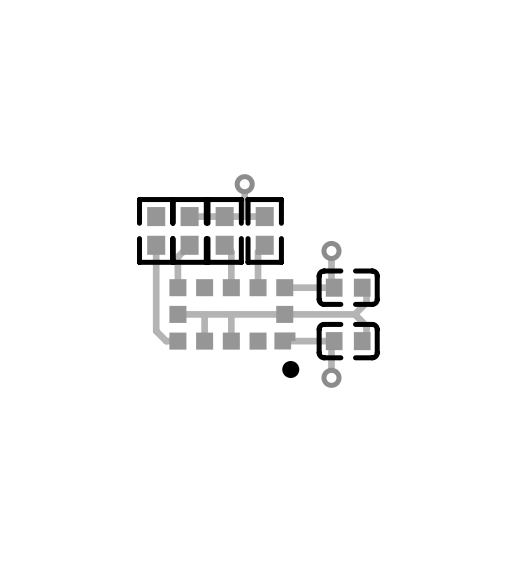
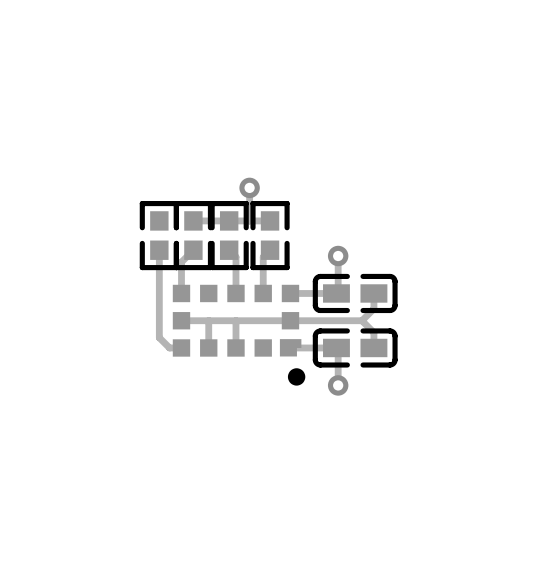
part footprint: [316, 268, 380, 307] -> [312, 273, 398, 314]
part footprint: [316, 321, 380, 361] -> [312, 328, 398, 368]

